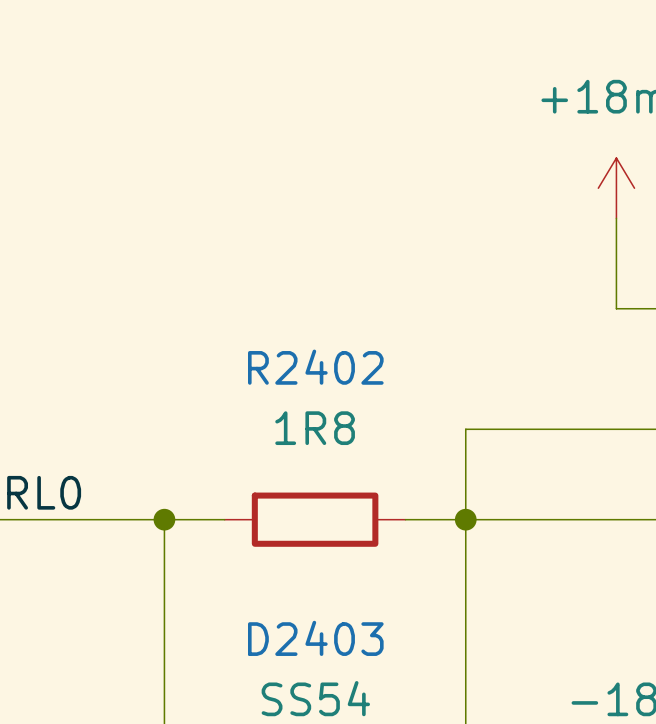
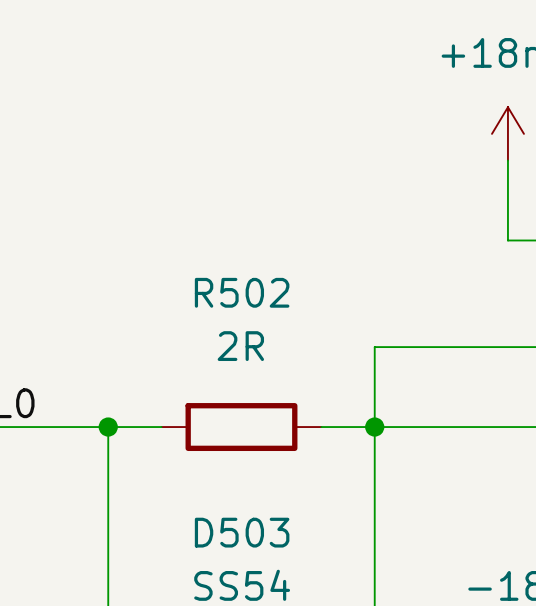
R2402 name: R2402 (315, 367) -> R502 (242, 292)
R2402 value: 1R8 (315, 428) -> 2R (240, 346)
D2403 name: D2403 (315, 638) -> D503 (242, 532)

